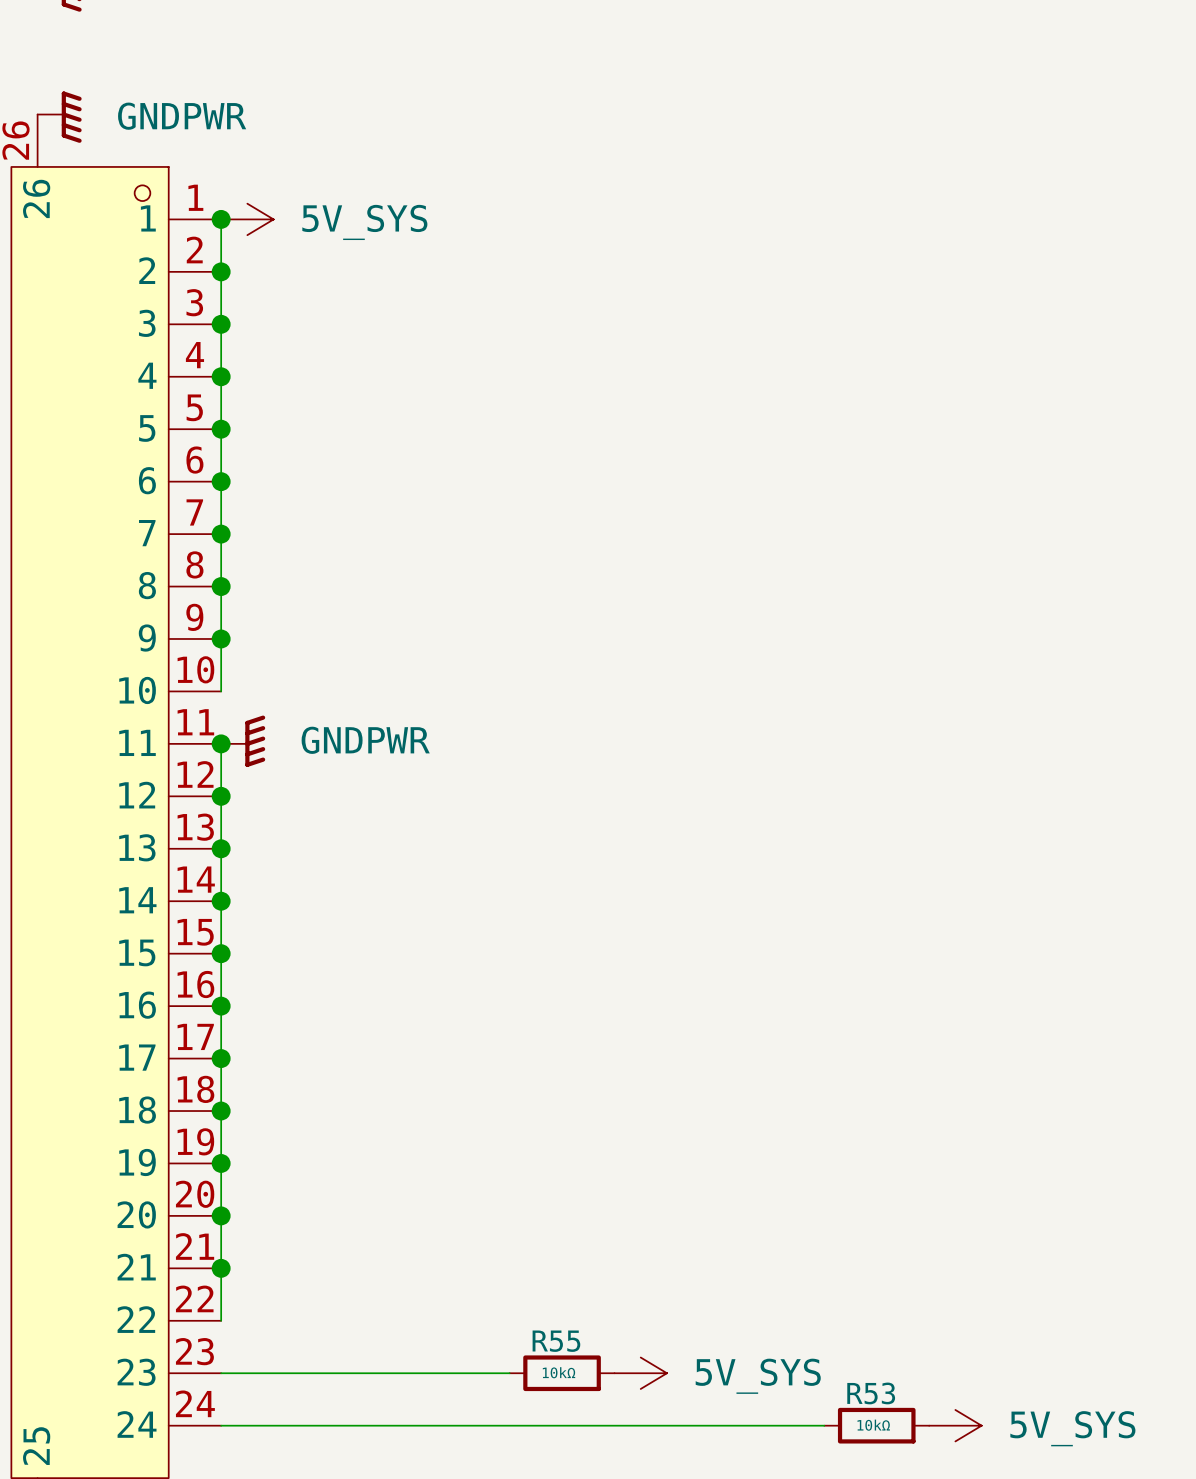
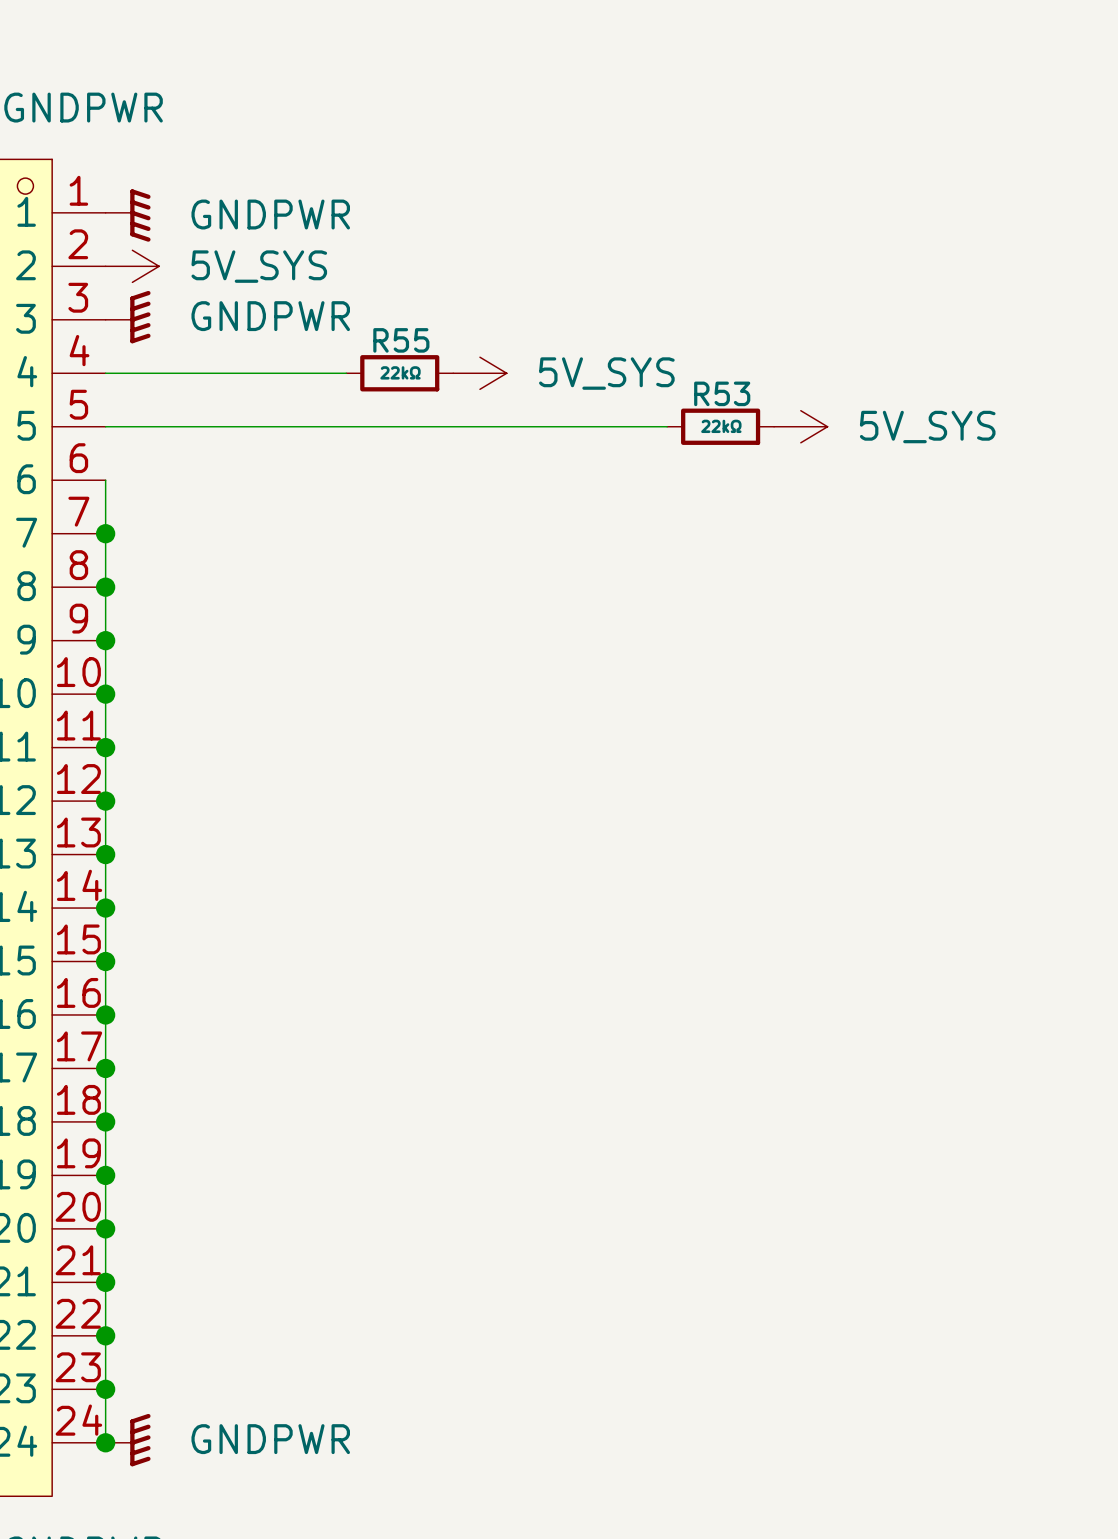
wire: (221, 219) (221, 481) -> none
junction: (221, 219) -> none
power symbol: 5V_SYS (247, 219) -> GNDPWR (128, 215)
junction: (221, 271) -> none
power symbol: none -> 5V_SYS (132, 266)
power symbol: none -> GNDPWR (128, 317)
junction: (221, 324) -> none
wire: none -> (105, 373) (346, 373)
junction: (221, 376) -> none
power symbol: none -> 5V_SYS (479, 373)
wire: none -> (105, 426) (667, 426)
junction: (221, 429) -> none
power symbol: none -> 5V_SYS (800, 426)
junction: (221, 481) -> none
wire: none -> (105, 694) (105, 747)
junction: none -> (105, 694)
power symbol: GNDPWR (243, 741) -> none
junction: none -> (105, 1335)
R55 value: 10kΩ (559, 1372) -> 22kΩ (400, 372)
wire: (221, 1373) (509, 1373) -> none
junction: none -> (105, 1389)
R55 position: (562, 1373) -> (399, 373)
power symbol: 5V_SYS (640, 1373) -> none
power symbol: none -> GNDPWR (128, 1440)
wire: (221, 1425) (824, 1425) -> (105, 1442) (105, 1335)
junction: none -> (105, 1442)
R53 value: 10kΩ (873, 1425) -> 22kΩ (721, 426)
R53 position: (876, 1425) -> (720, 426)
power symbol: 5V_SYS (955, 1425) -> none

